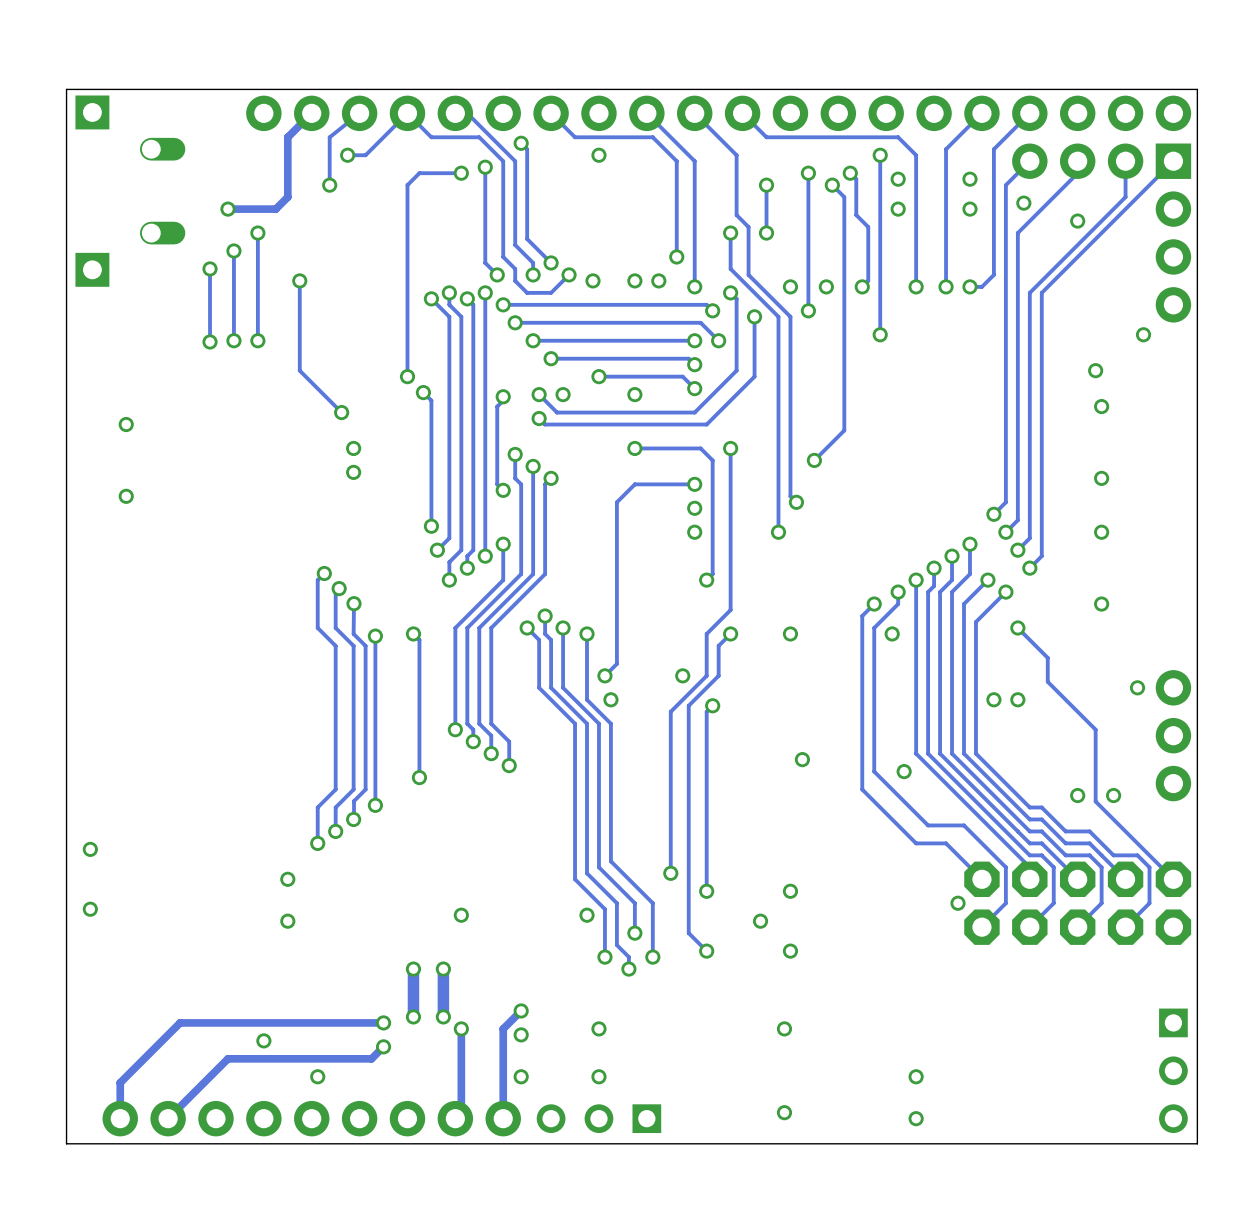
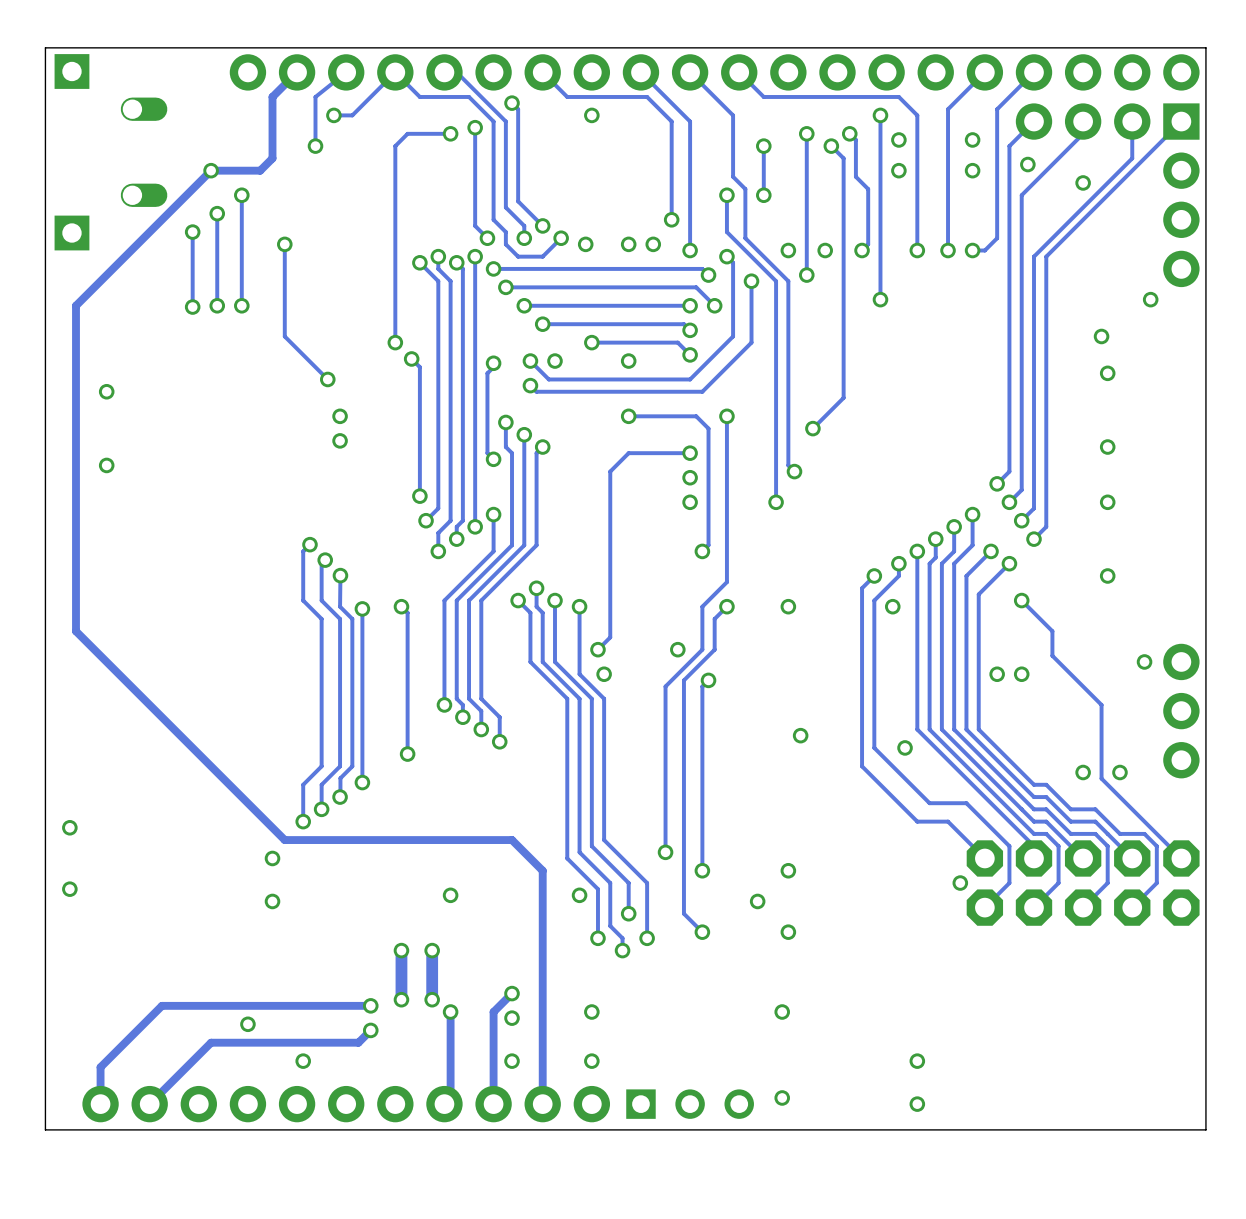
track: none -> (211, 170) (75, 305) (75, 631) (284, 840) (512, 840) (542, 870) (542, 1104)
part: (1173, 1070) -> none
part: none -> (567, 1104)
part rotation: 0° (598, 1118) -> 180° (690, 1104)
part position: (598, 1118) -> (690, 1104)

